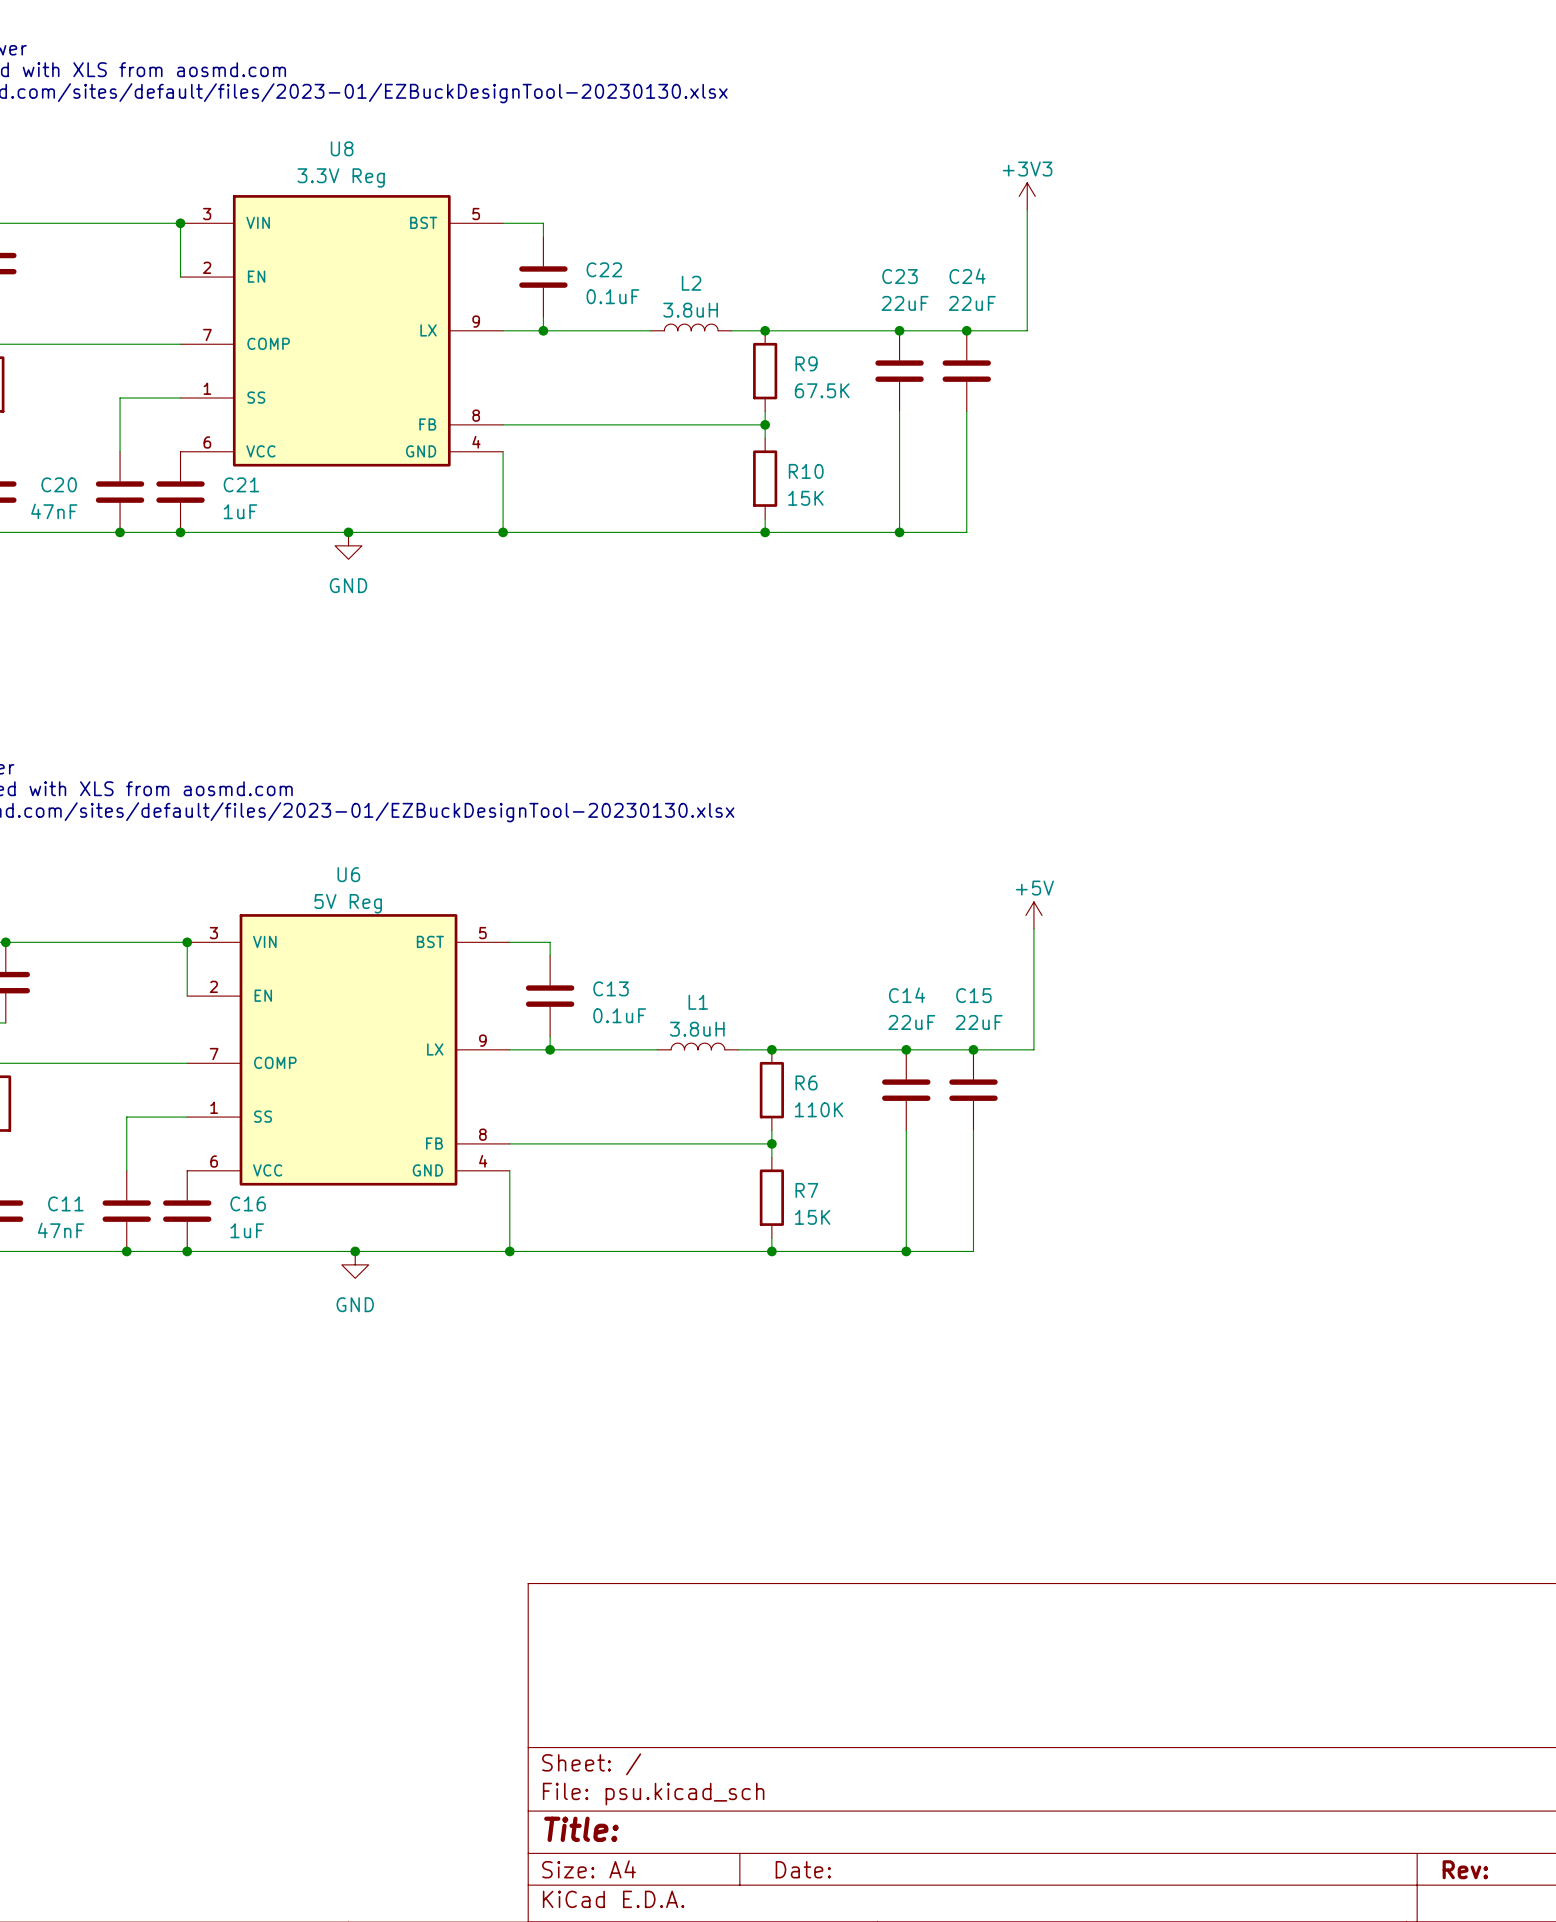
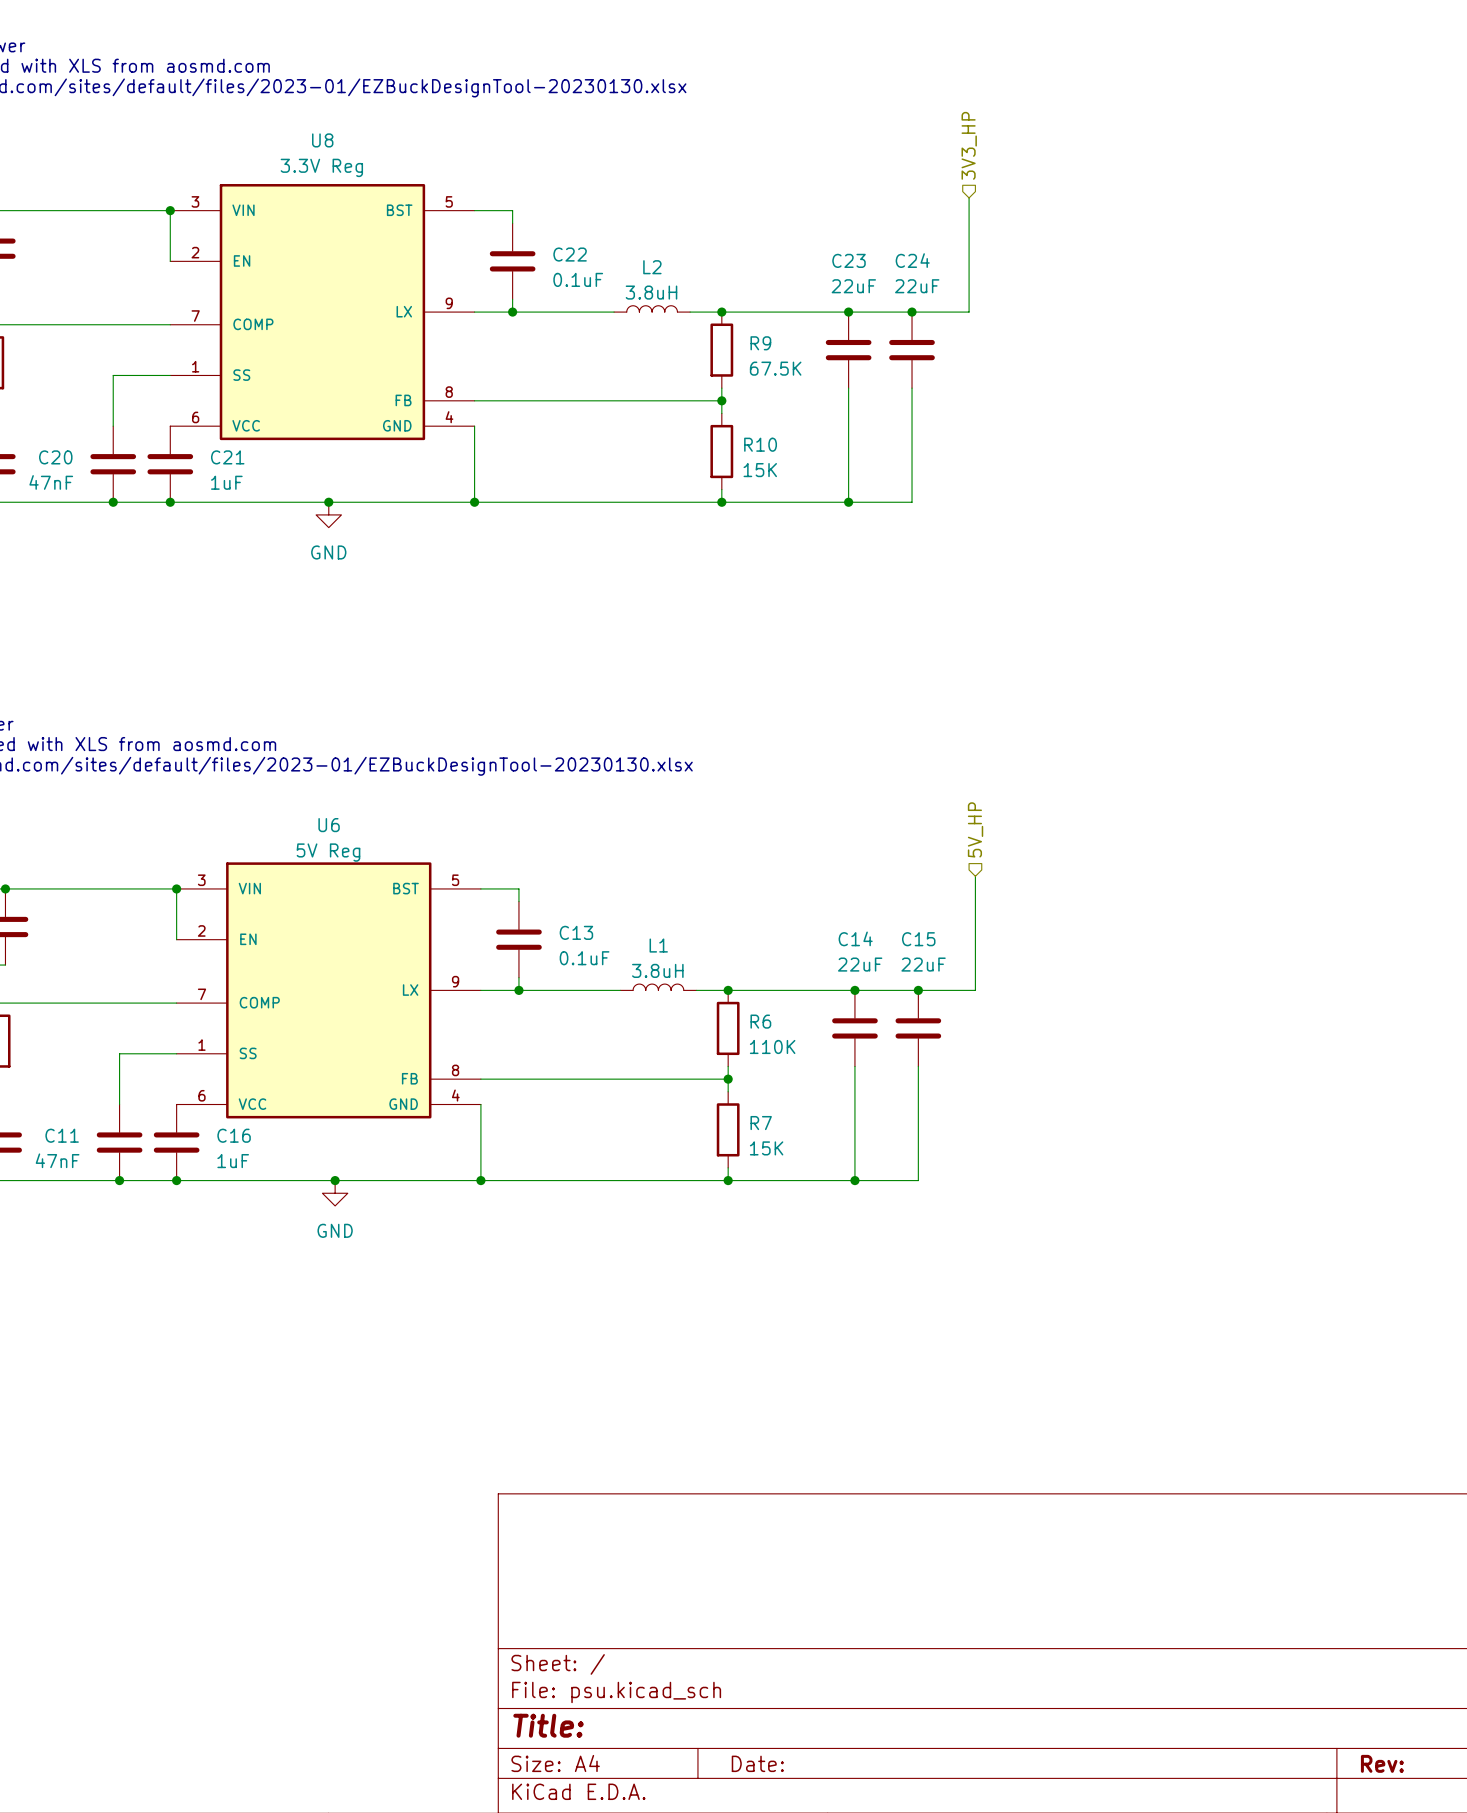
hierarchical label: none -> 3V3_HP (969, 145)
power symbol: +3V3 (1027, 196) -> none
hierarchical label: none -> 5V_HP (975, 829)
power symbol: +5V (1033, 915) -> none

